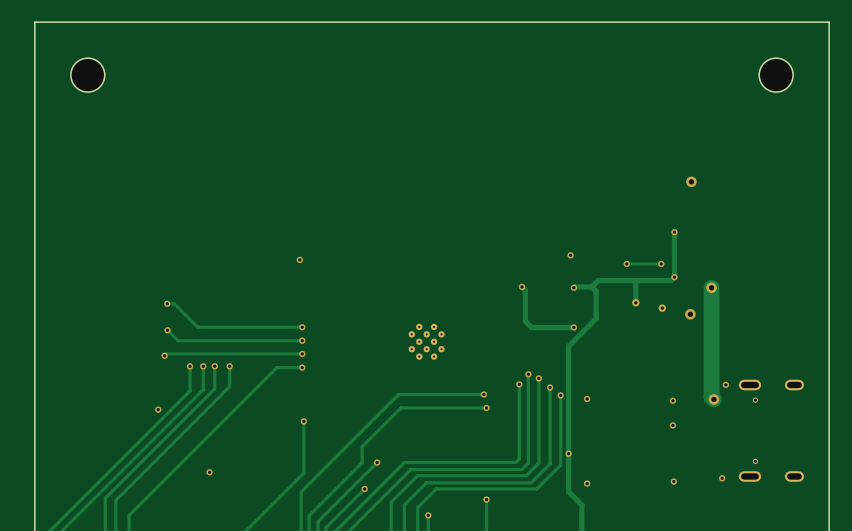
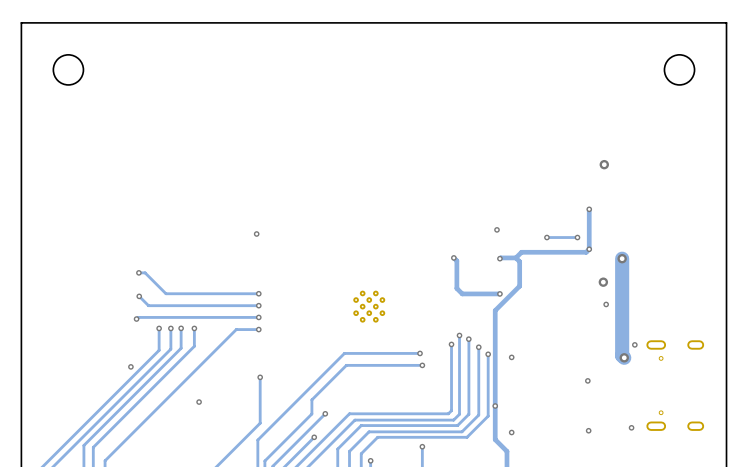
track: (635, 280) (635, 302) -> none
via: (635, 302) -> none
via: (662, 308) -> none
via: none -> (606, 304)
via: (672, 400) -> none
via position: (209, 472) -> (199, 402)

